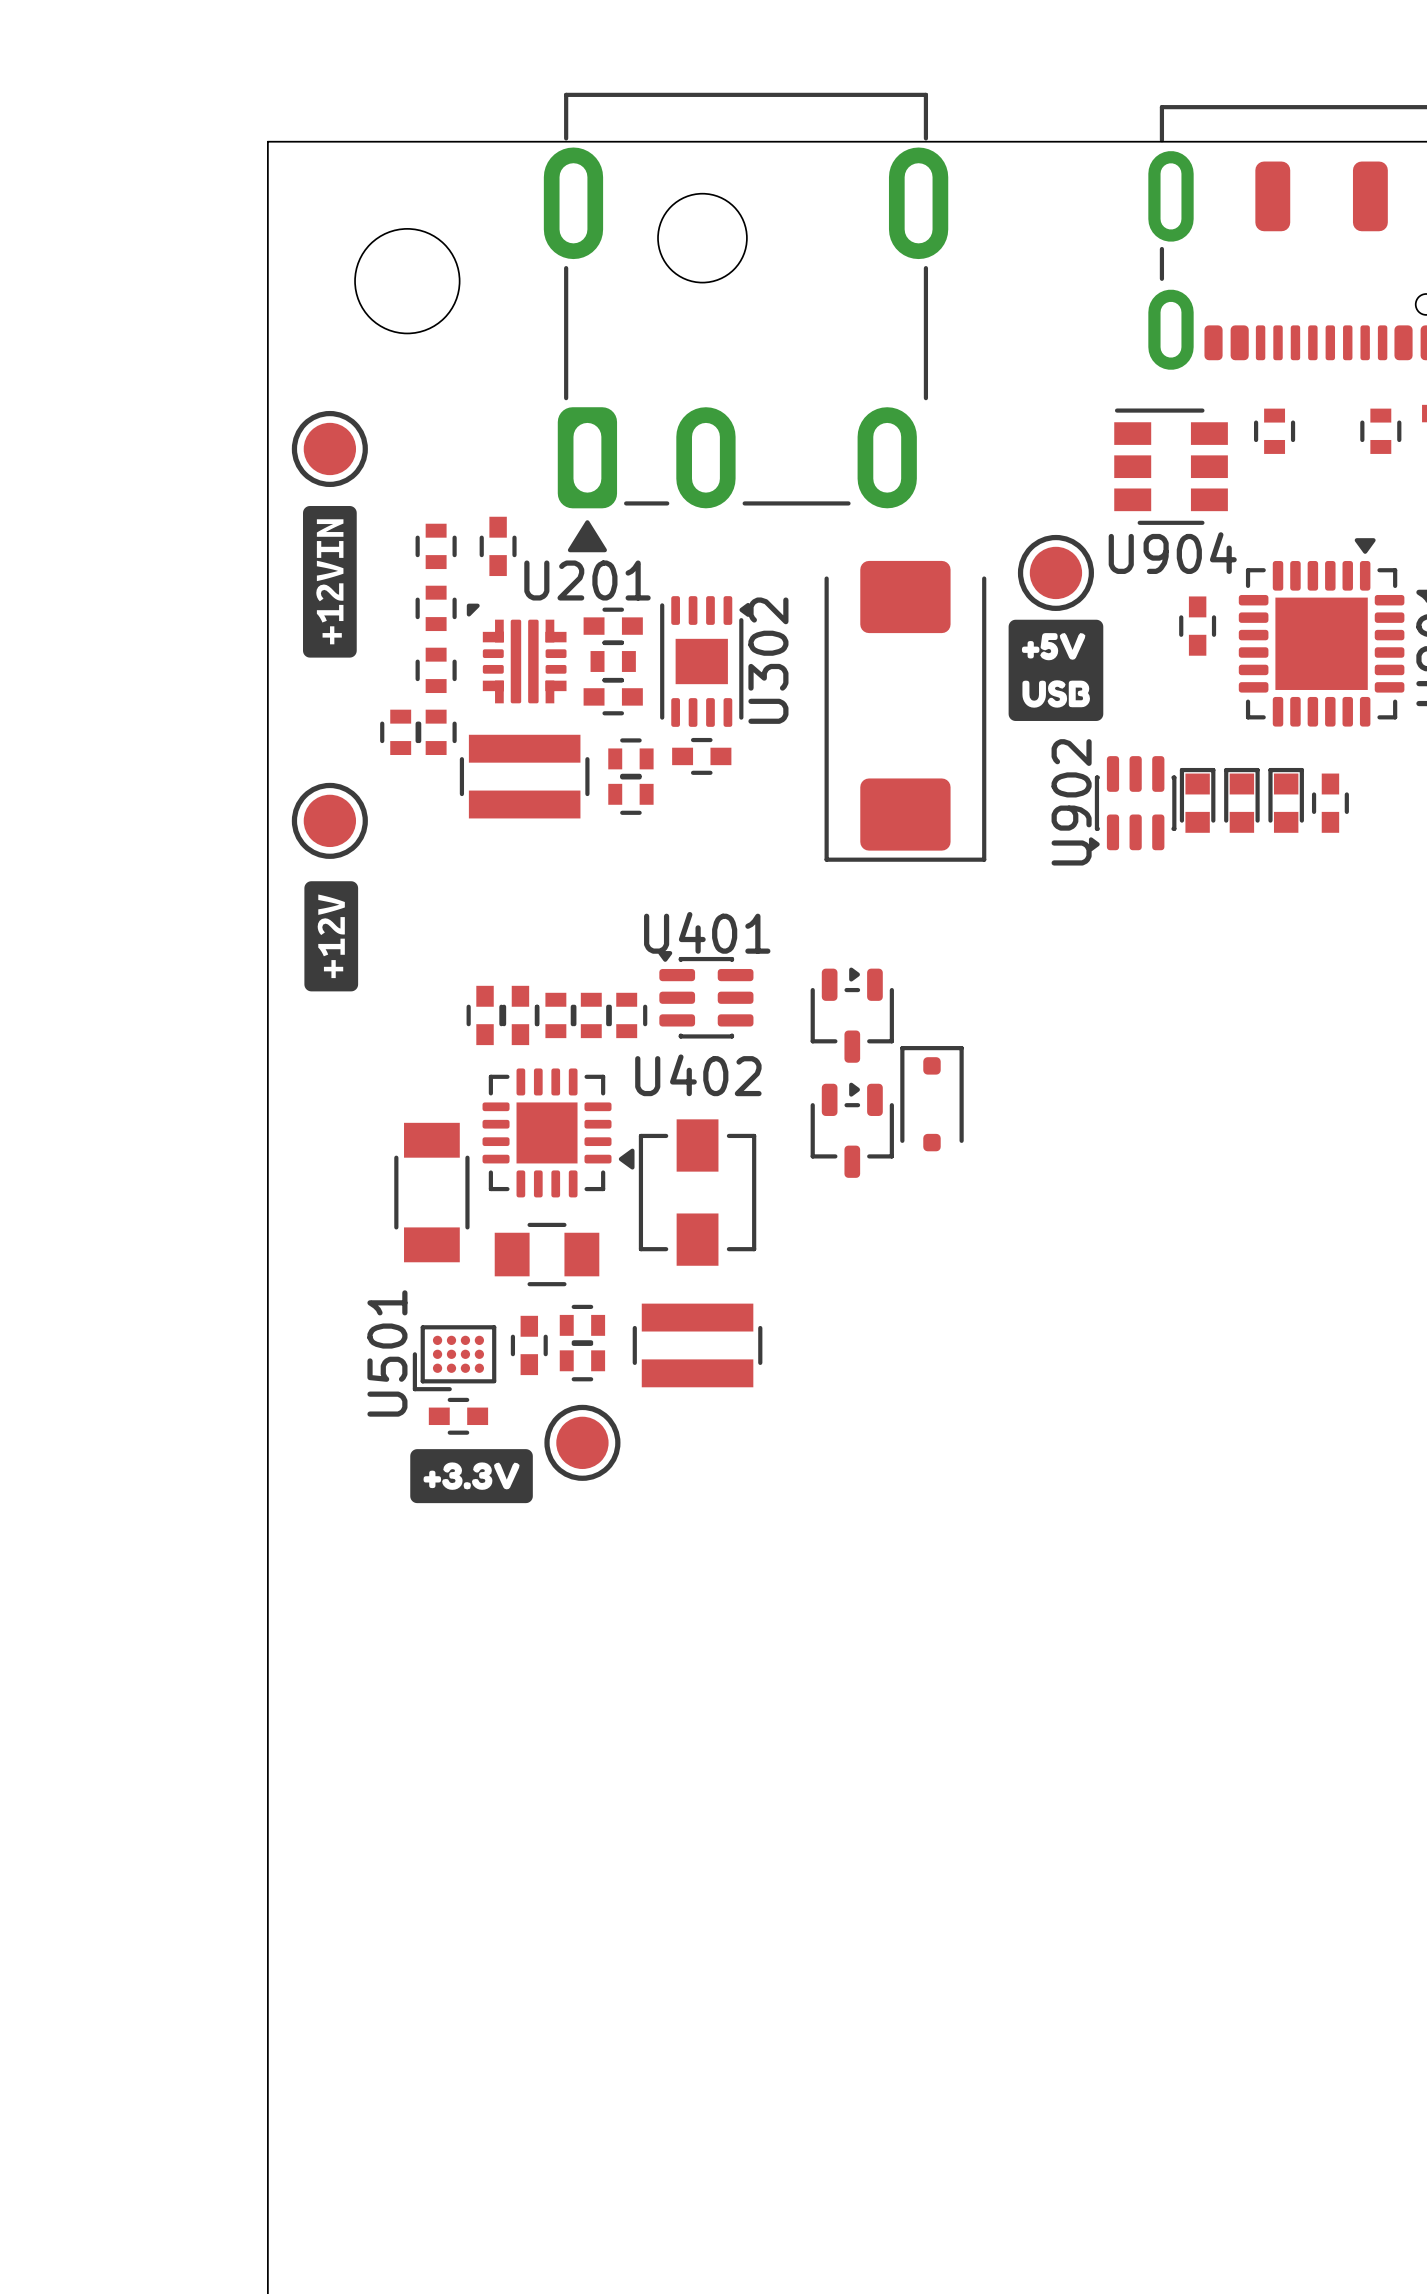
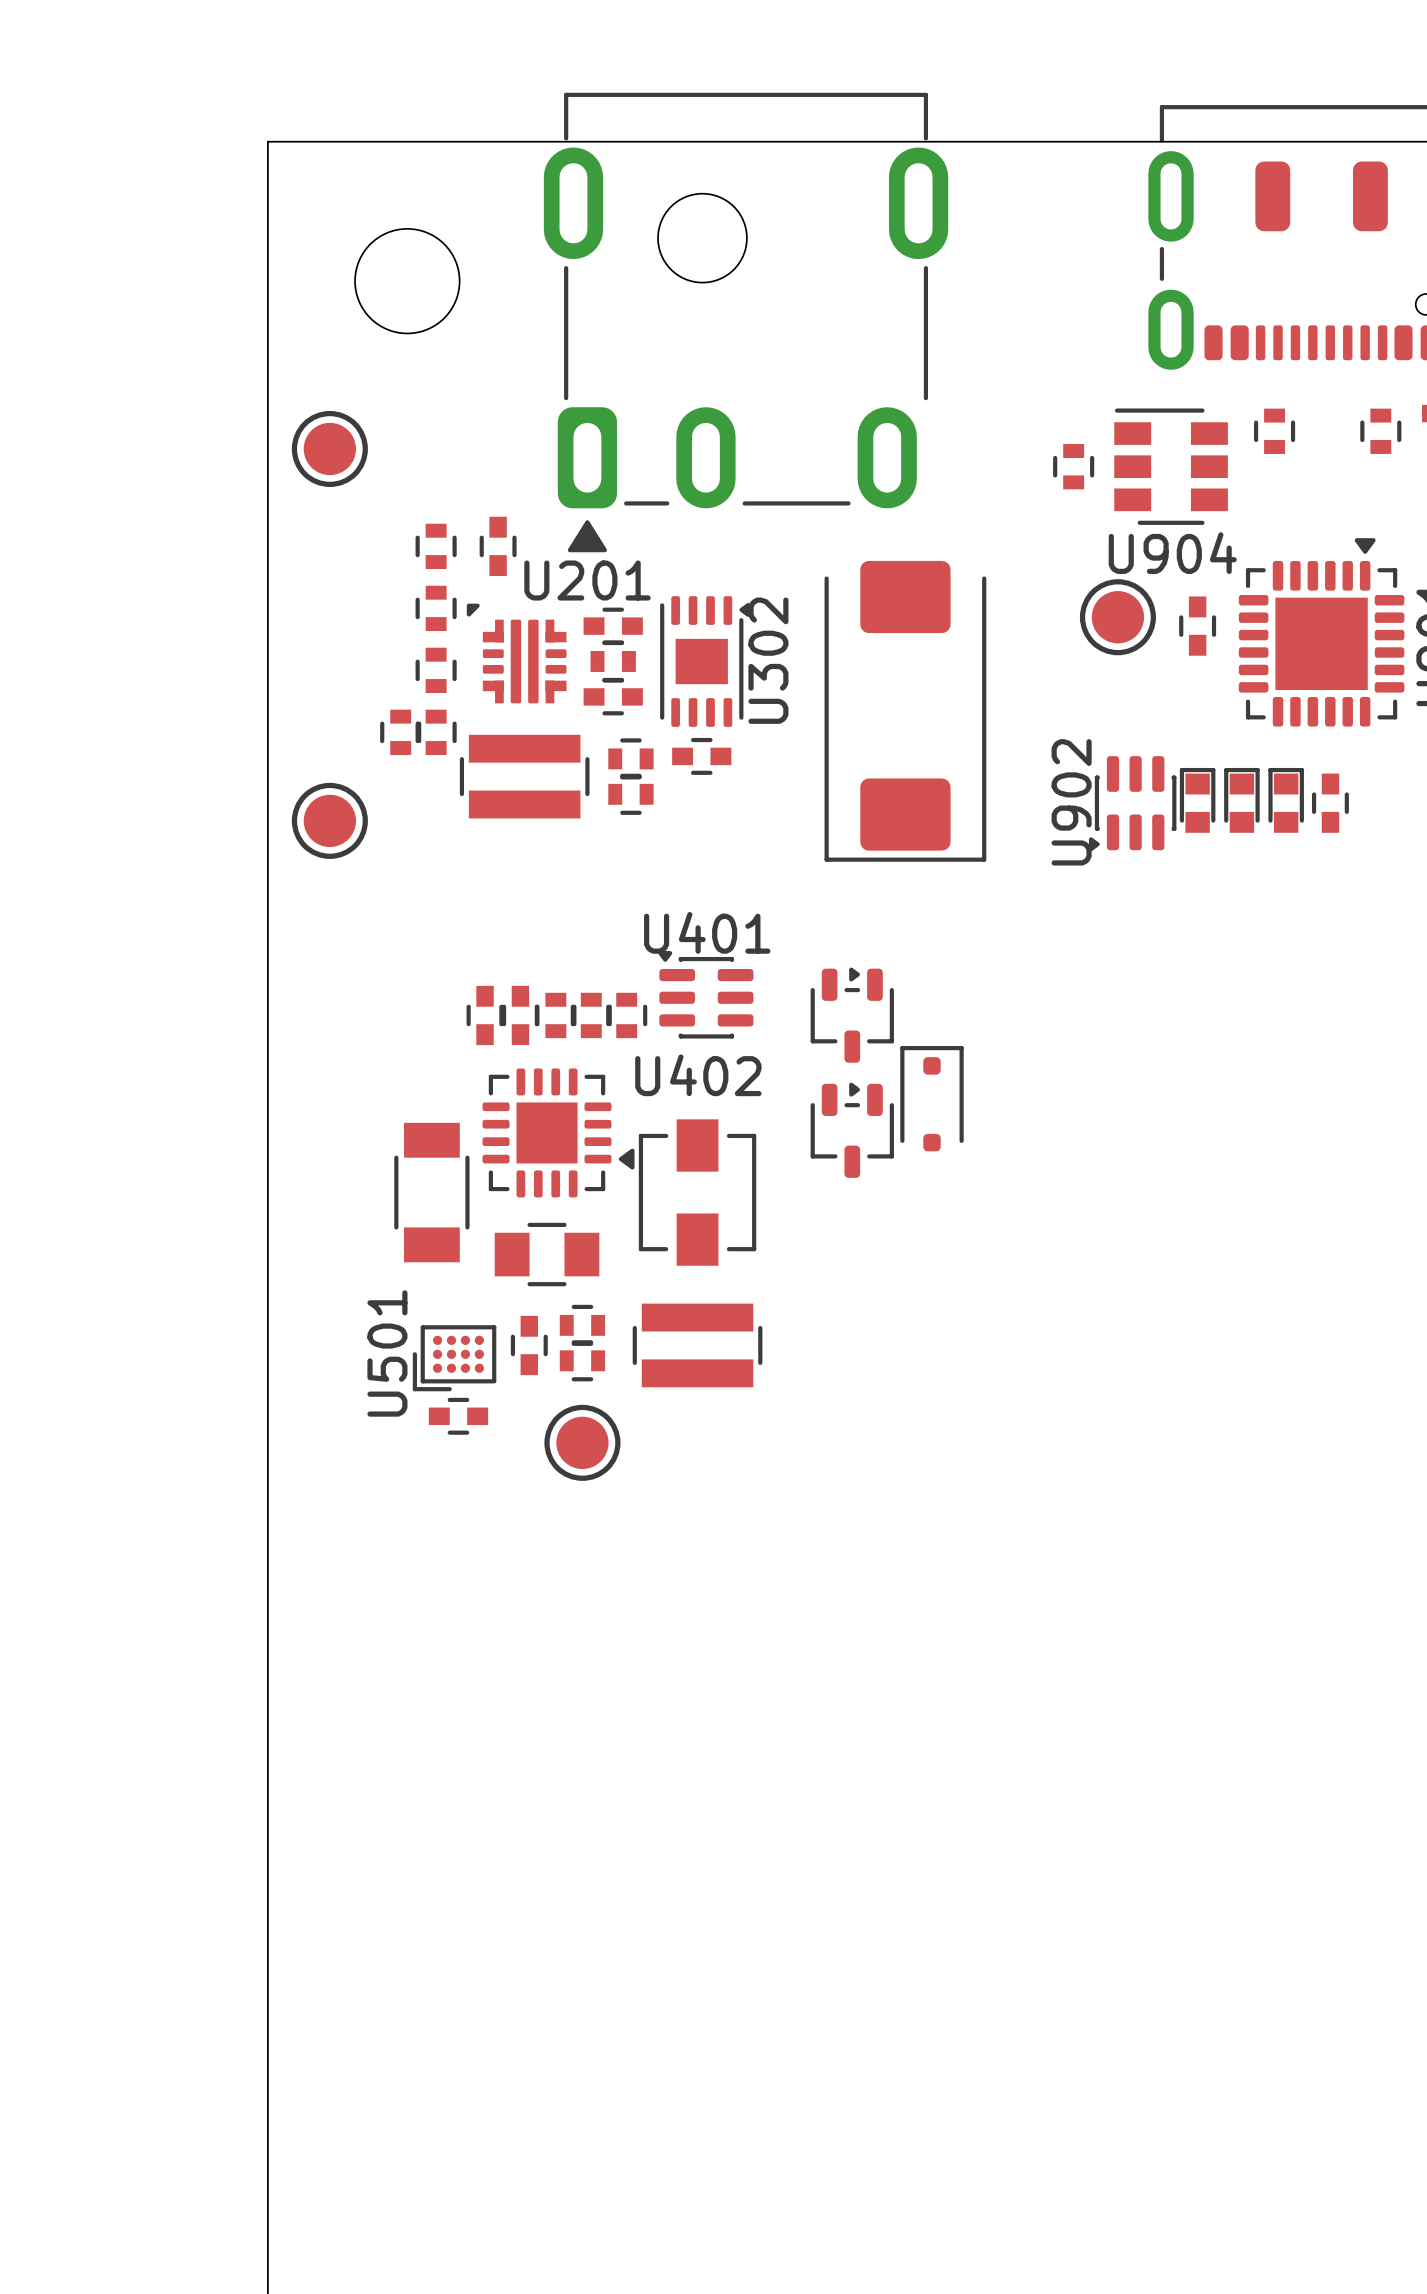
part: none -> (1073, 466)
drawing: [303, 506, 357, 658] -> none
part position: (1055, 572) -> (1117, 617)
drawing: [1008, 619, 1104, 721] -> none
drawing: [304, 881, 359, 992] -> none
drawing: [410, 1449, 533, 1504] -> none

